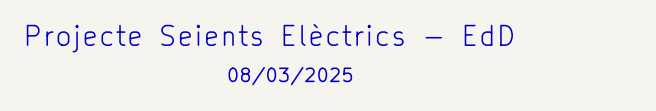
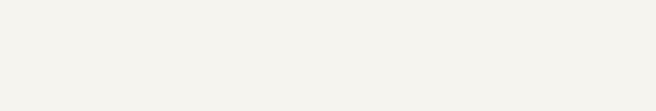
text: Projecte Seients Elèctrics - EdD (269, 38) -> none
text: 08/03/2025 (290, 76) -> none

